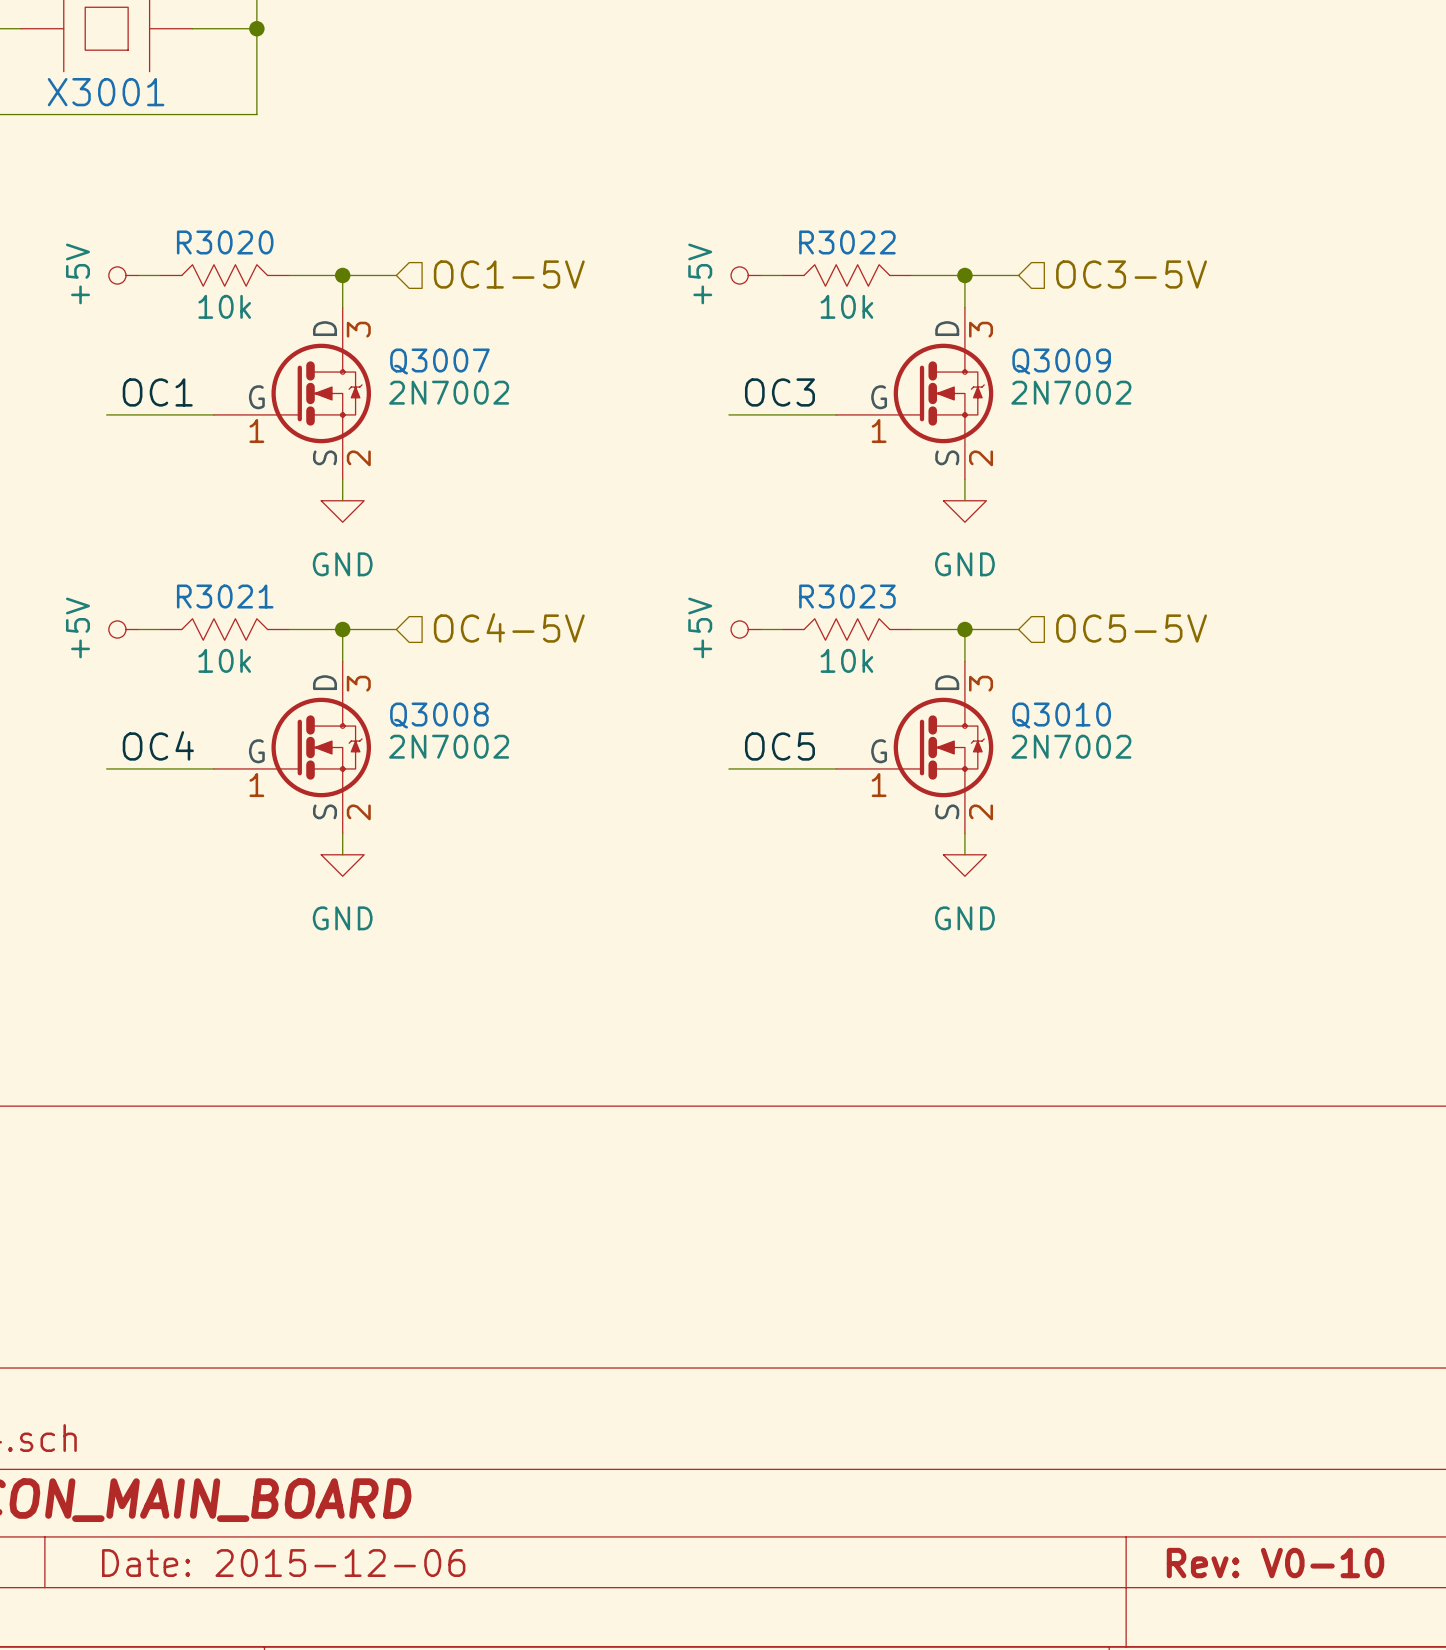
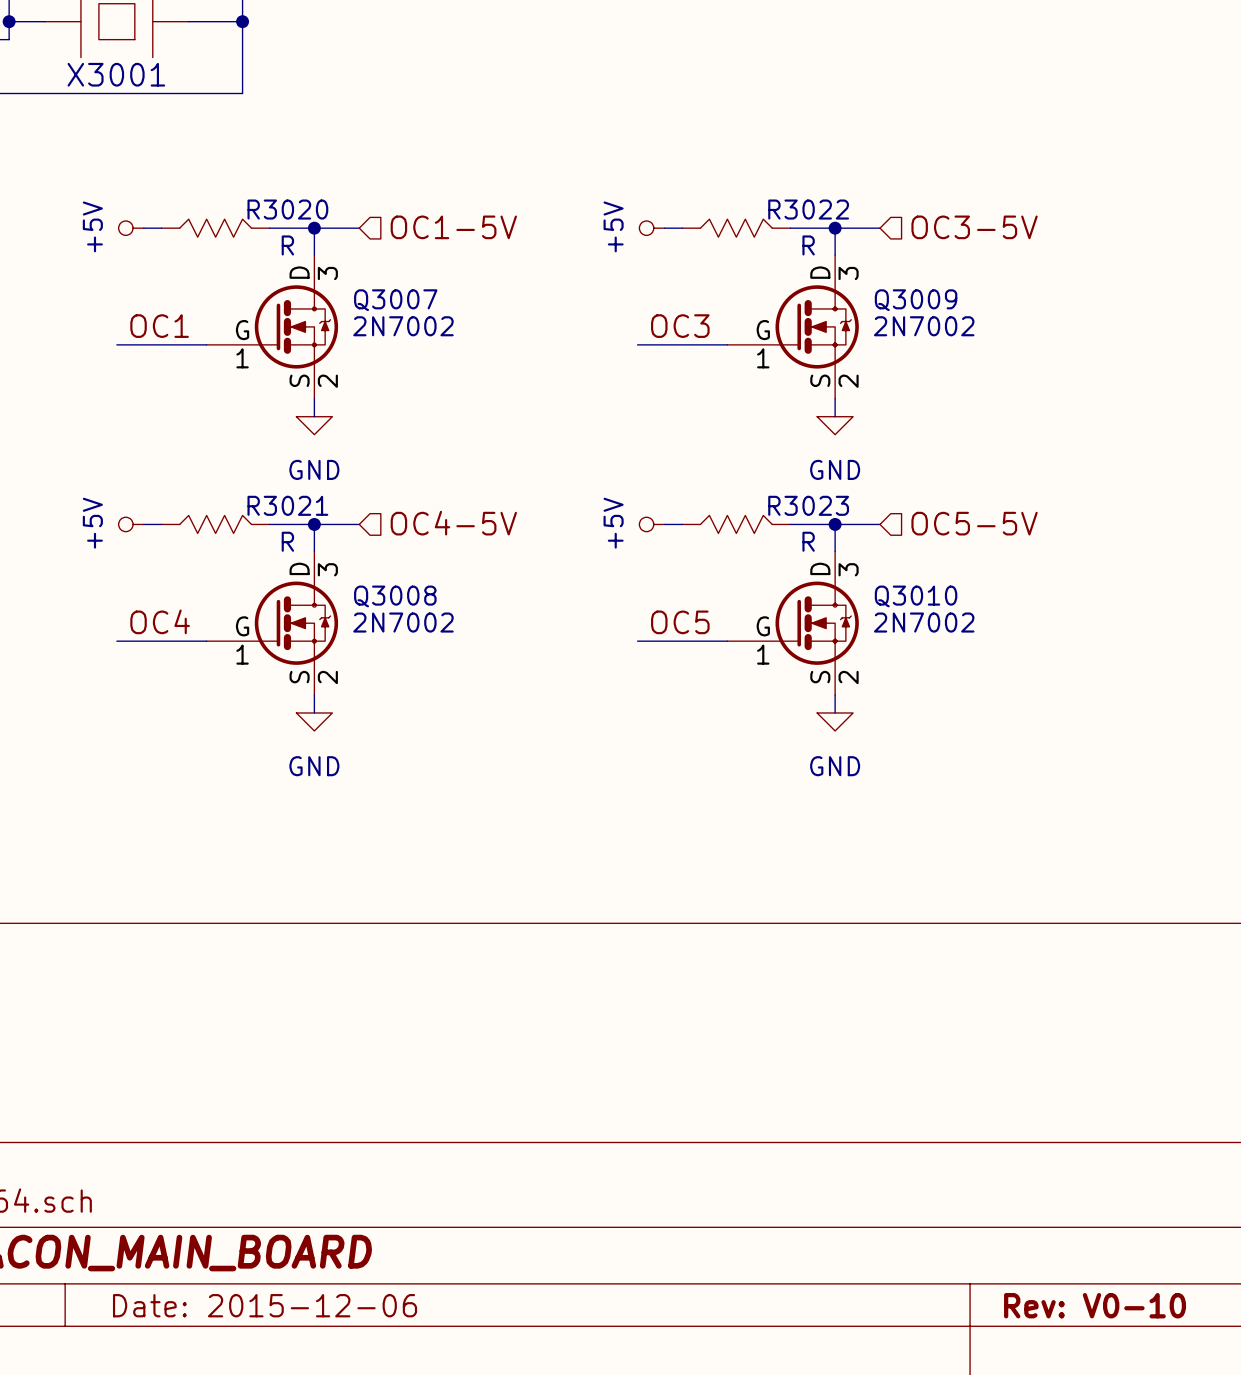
R3020 name position: R3020 (225, 242) -> R3020 (287, 209)
R3022 name position: R3022 (847, 242) -> R3022 (808, 209)
R3020 value: 10k (224, 306) -> R (287, 245)
R3022 value: 10k (846, 306) -> R (808, 245)
R3021 name position: R3021 (225, 596) -> R3021 (287, 505)
R3023 name position: R3023 (847, 596) -> R3023 (808, 505)
R3021 value: 10k (224, 660) -> R (287, 541)
R3023 value: 10k (846, 660) -> R (808, 541)

